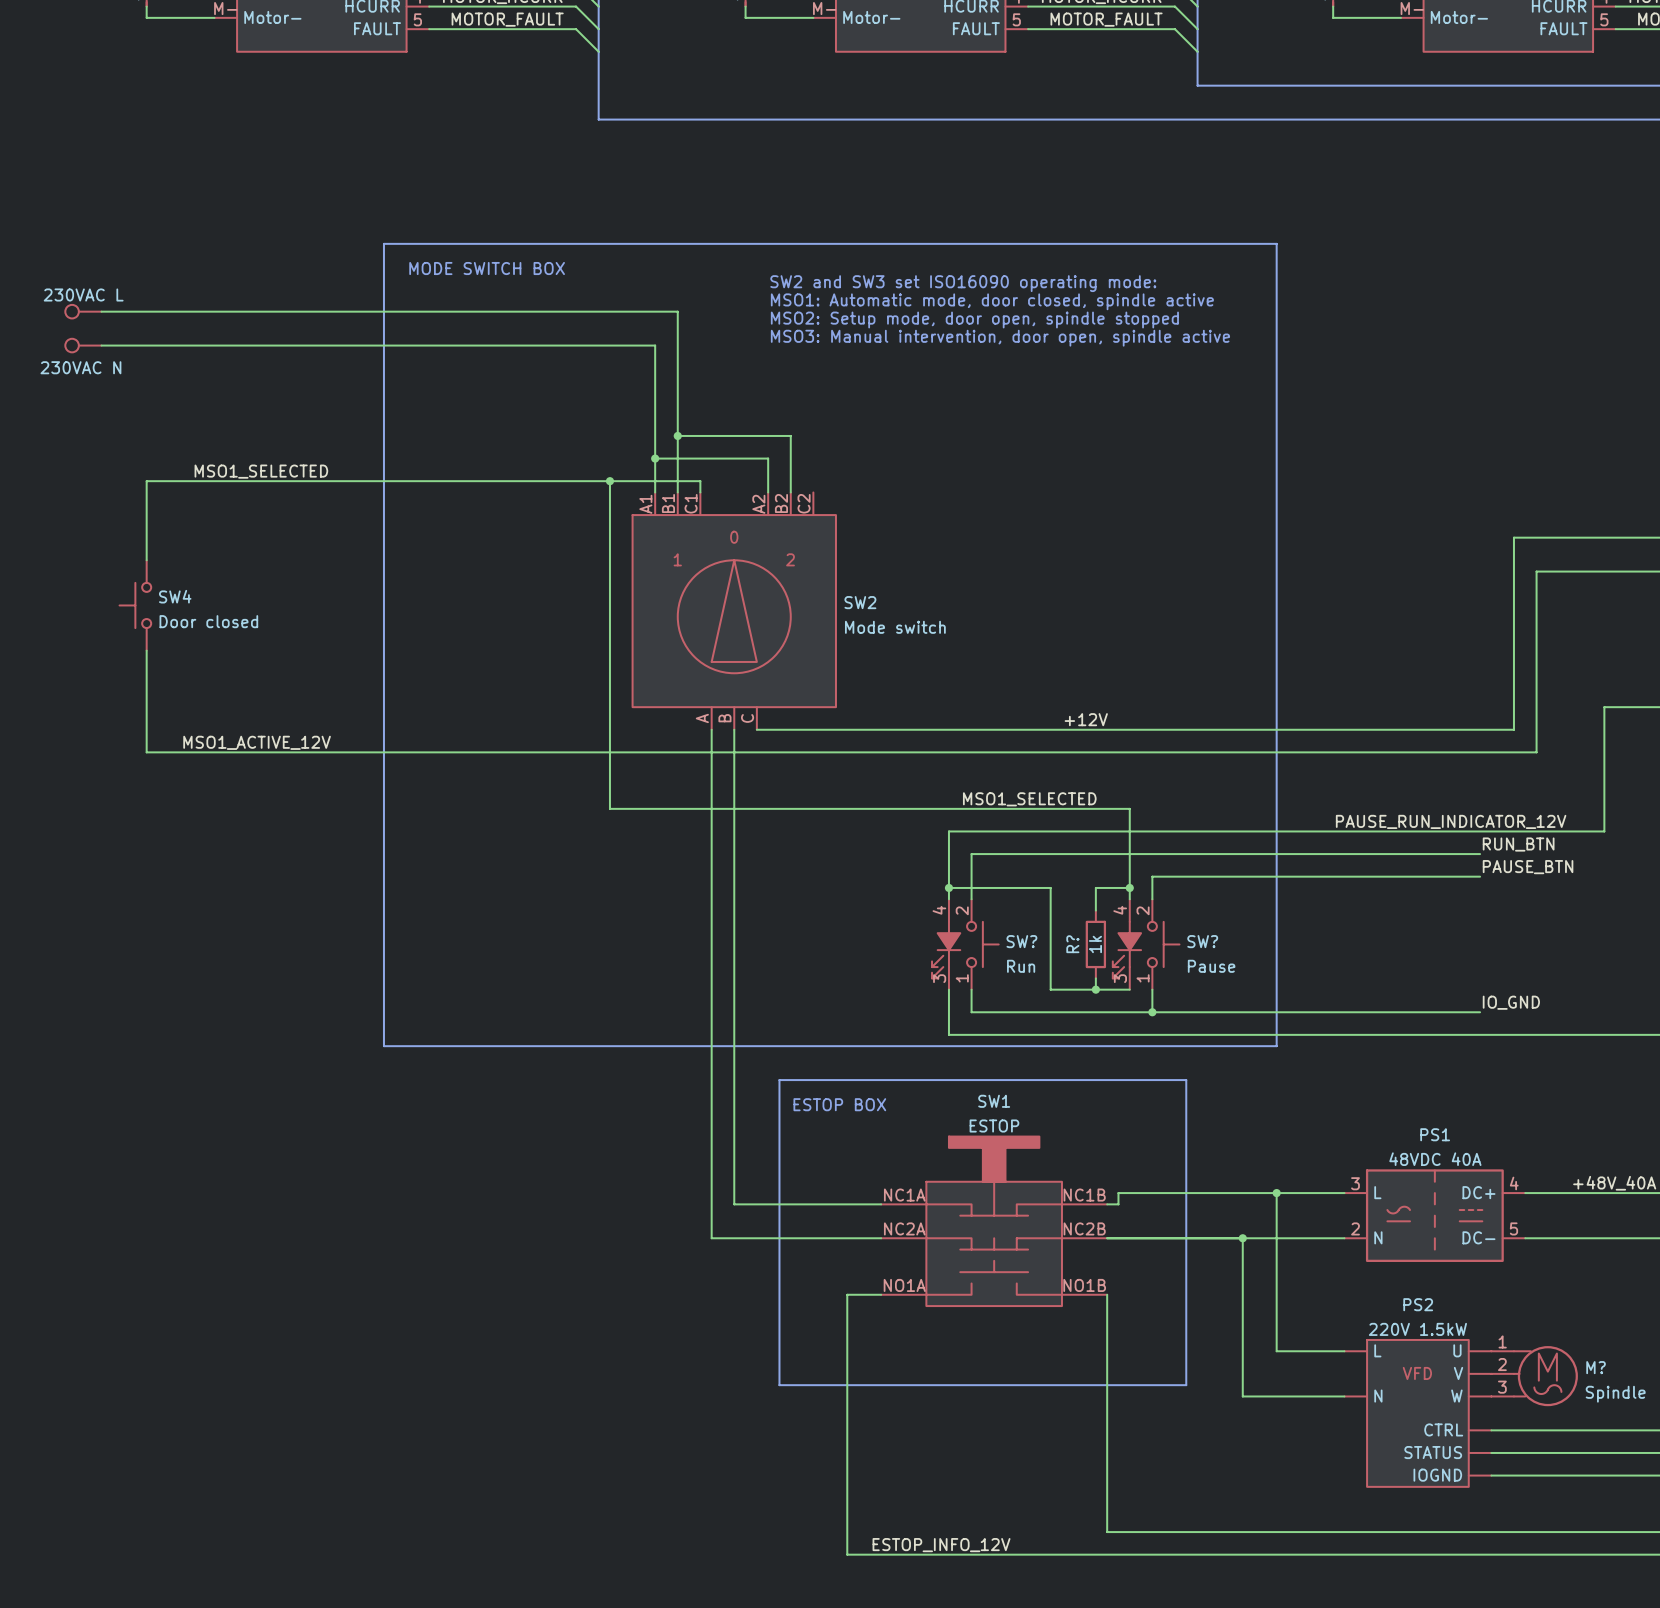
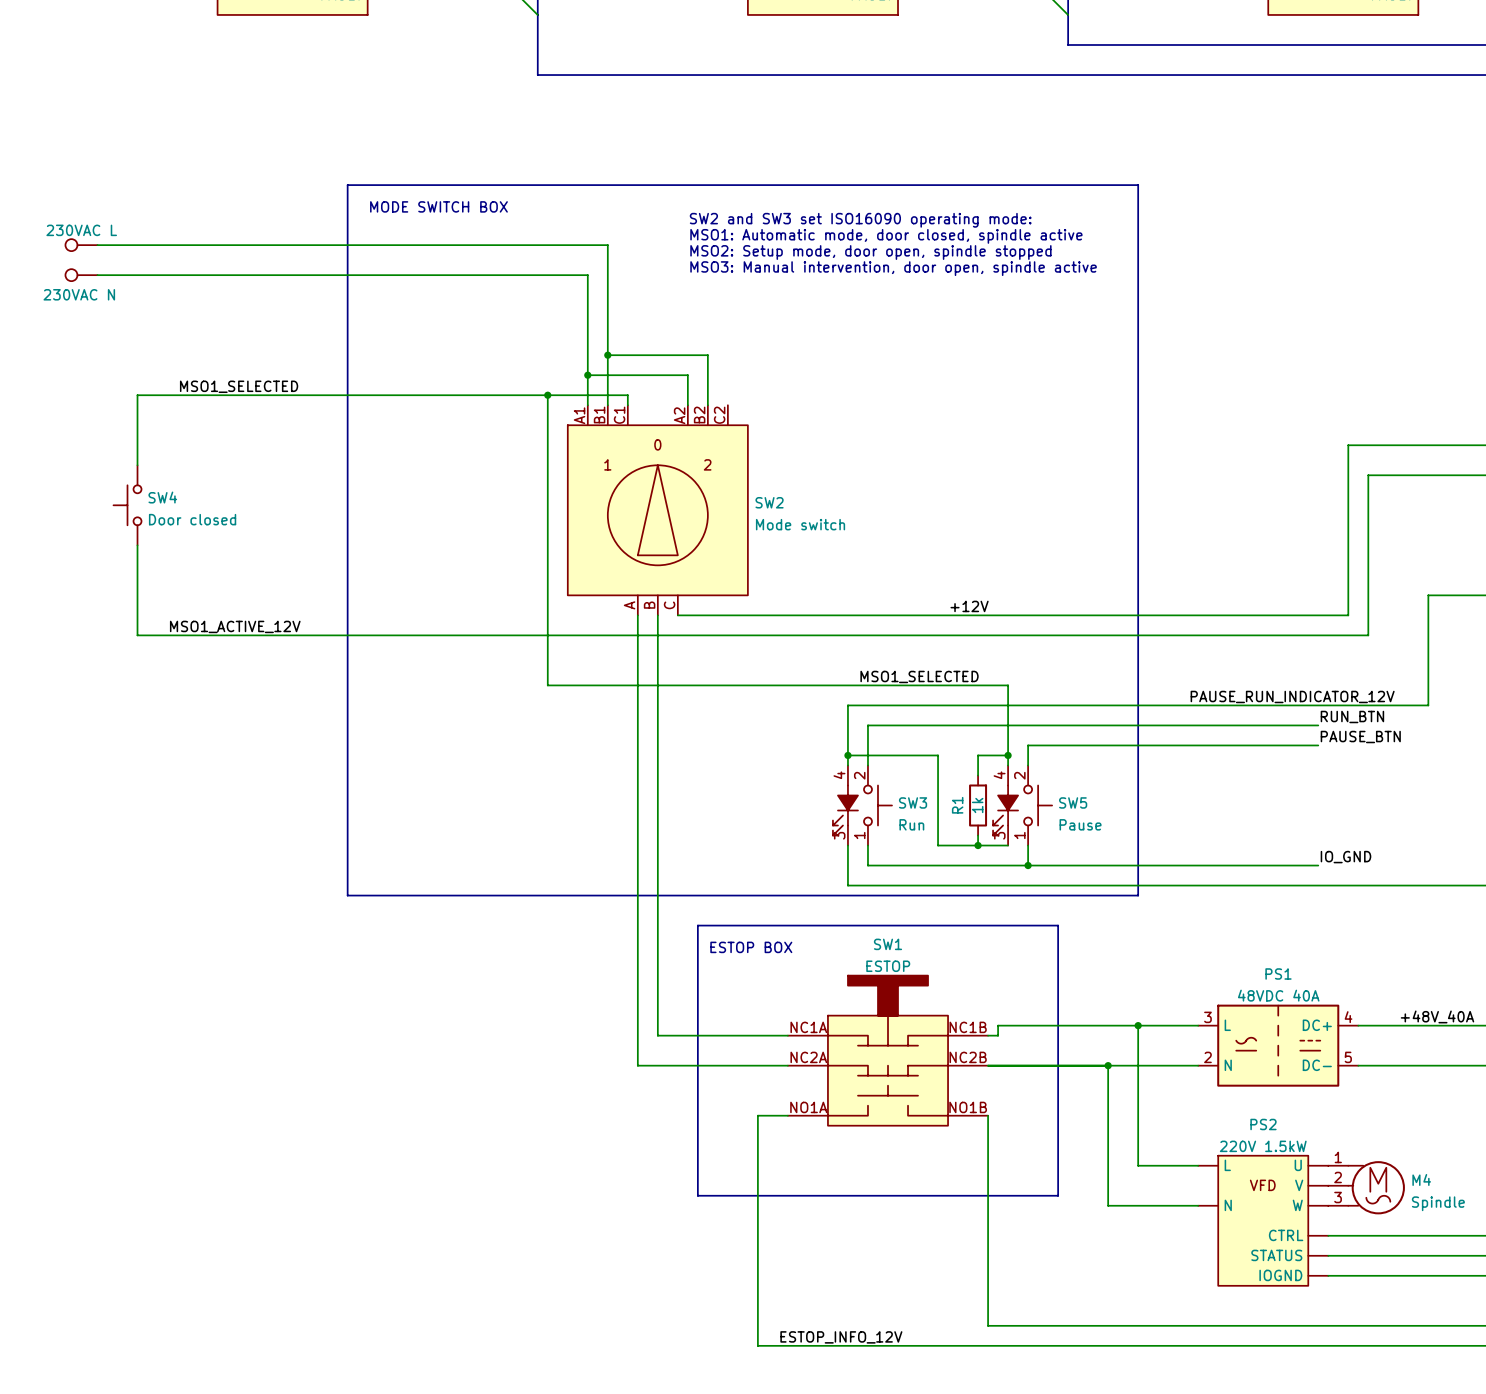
SW? name: SW? (1021, 941) -> SW3 (913, 802)
SW? name: SW? (1202, 941) -> SW5 (1073, 802)
R? name: R? (1072, 944) -> R1 (957, 805)
M? name: M? (1596, 1367) -> M4 (1421, 1179)

